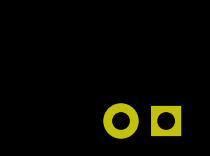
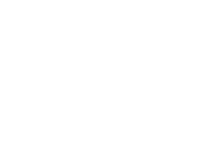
part: (142, 120) -> none

